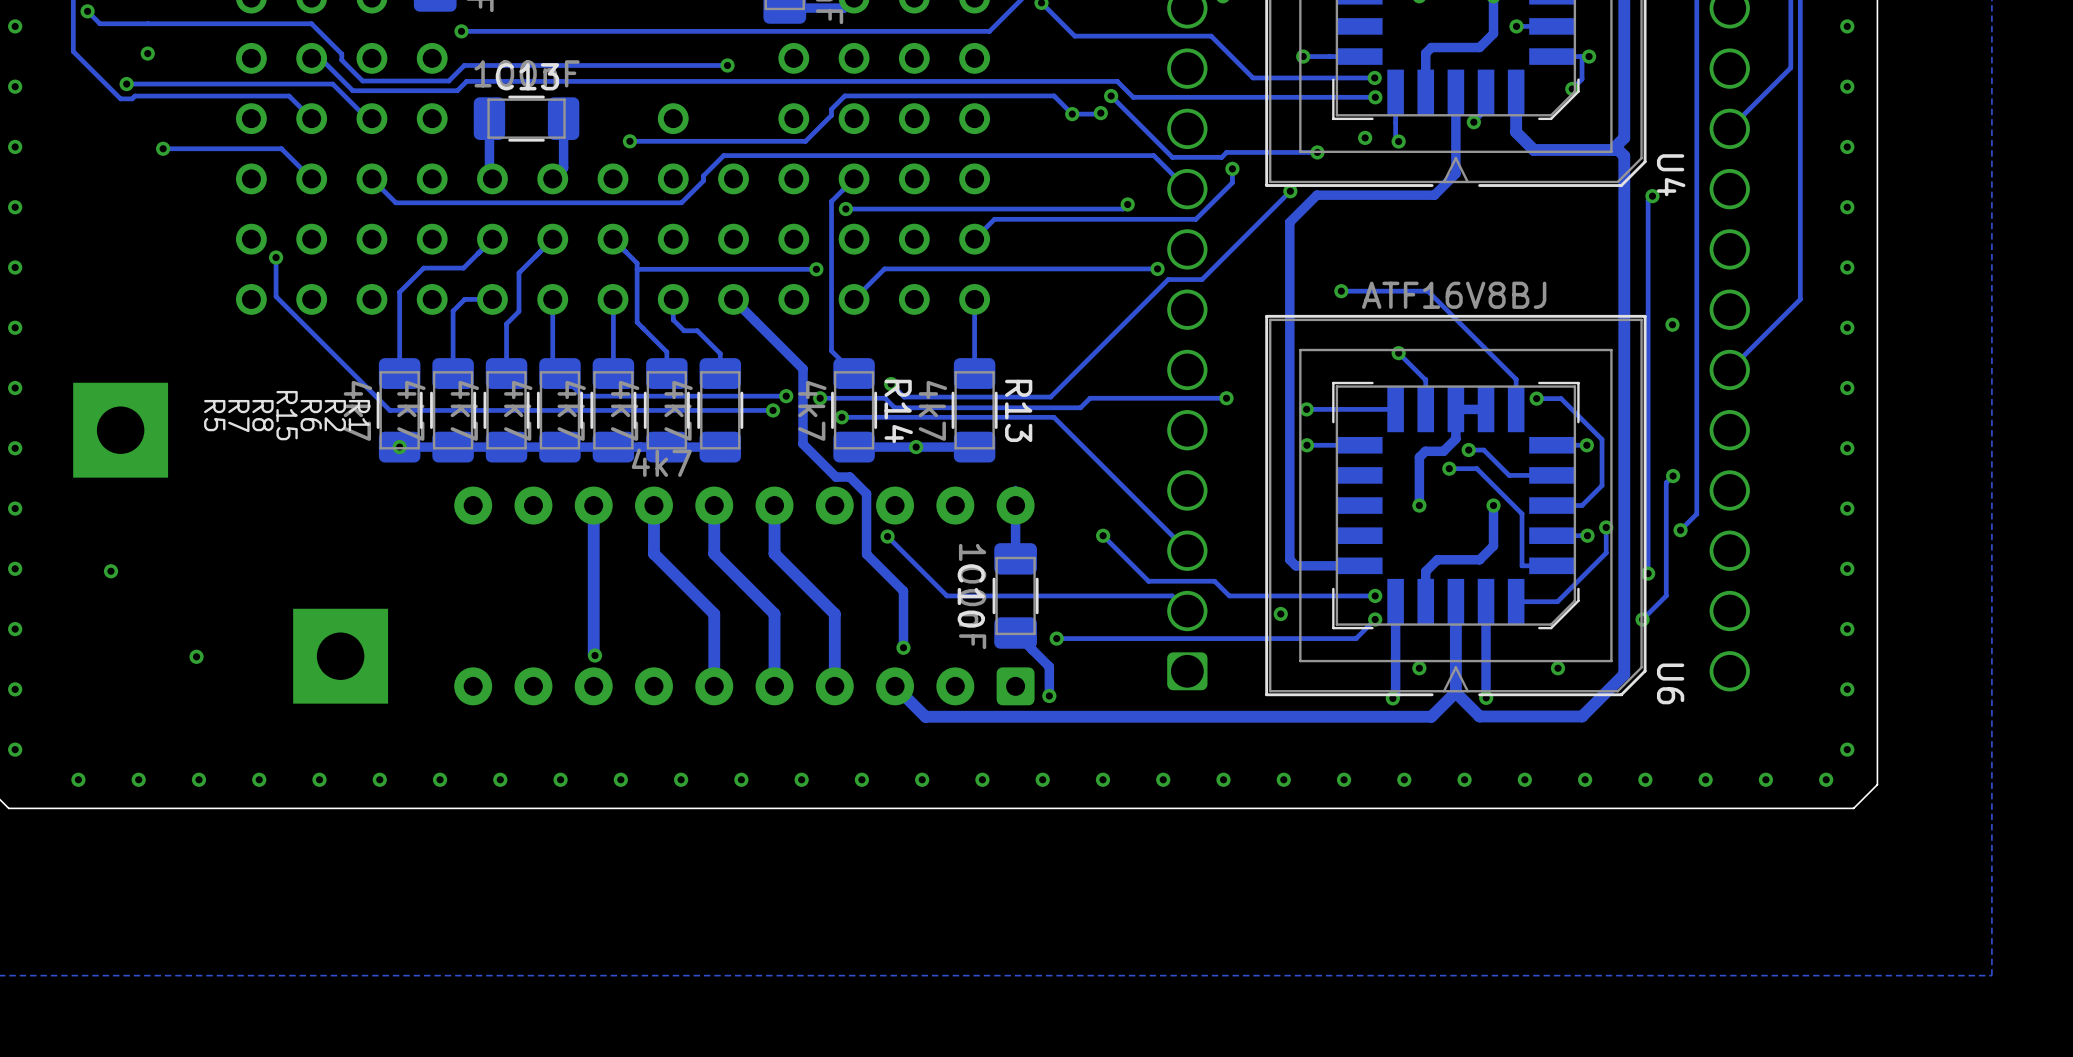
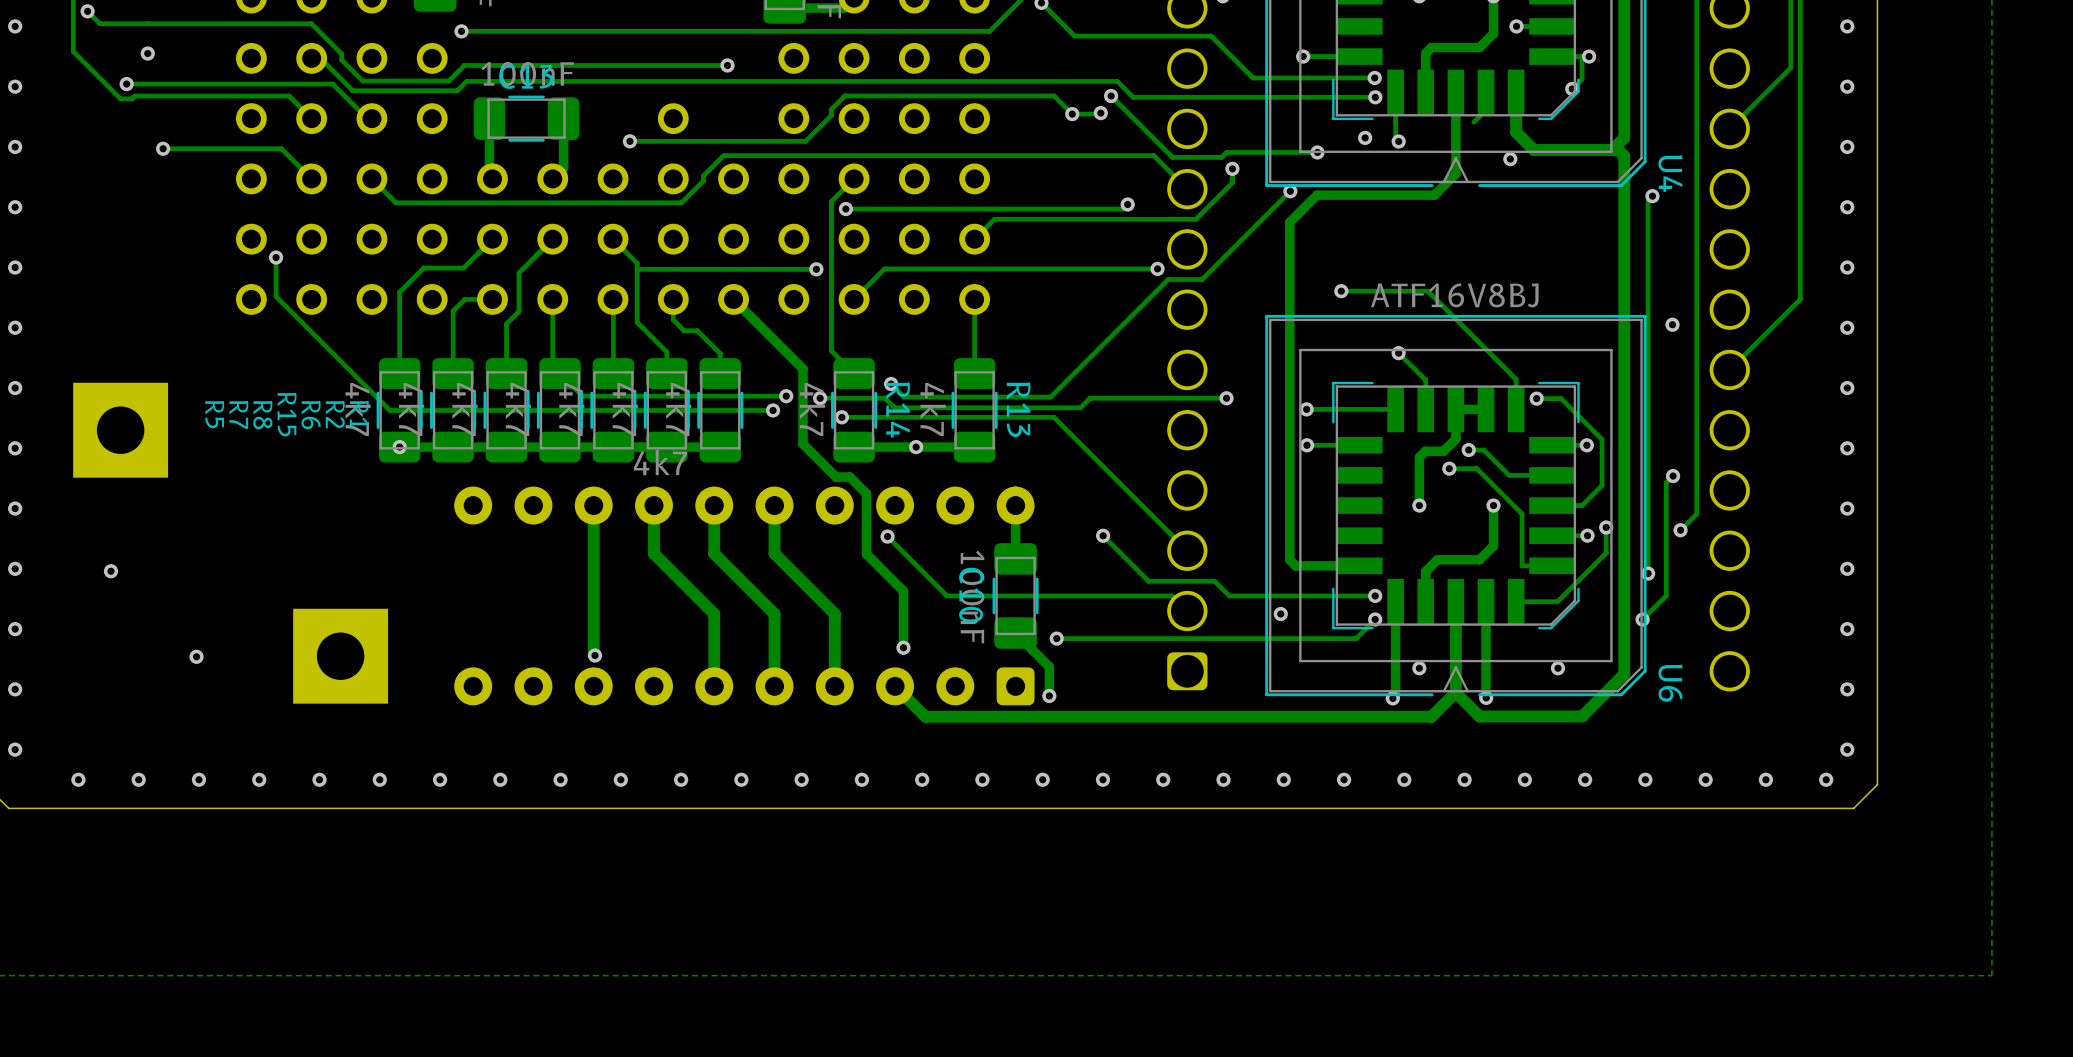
via position: (1473, 122) -> (1510, 159)

